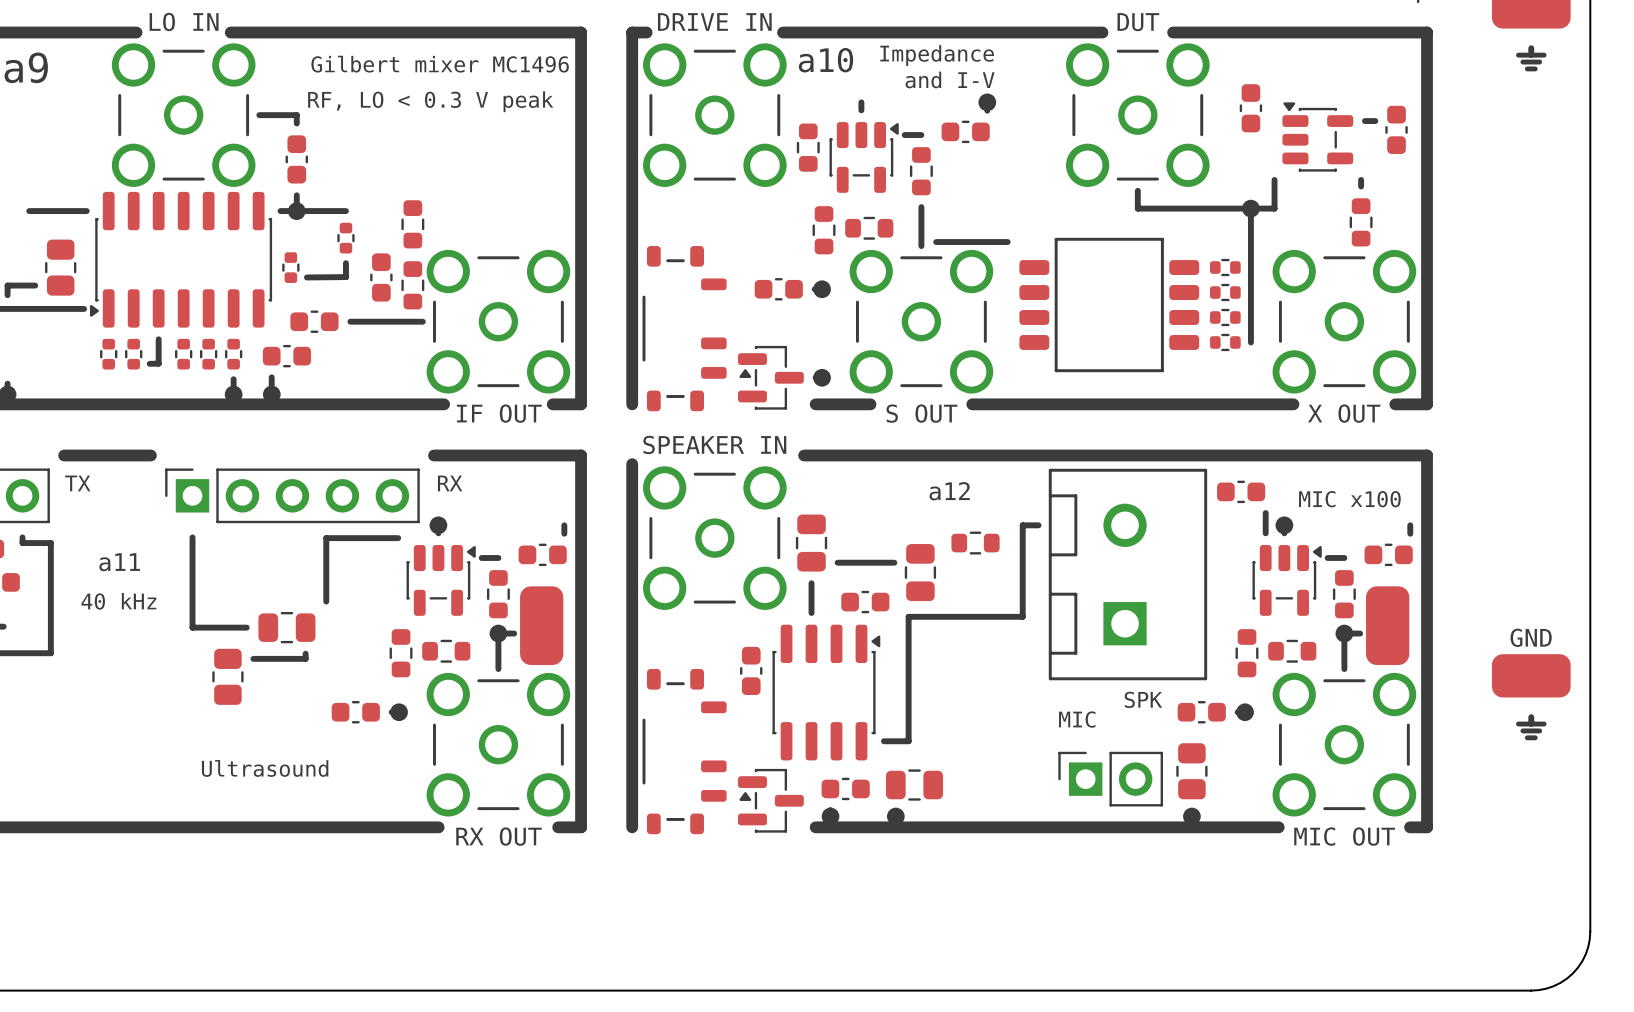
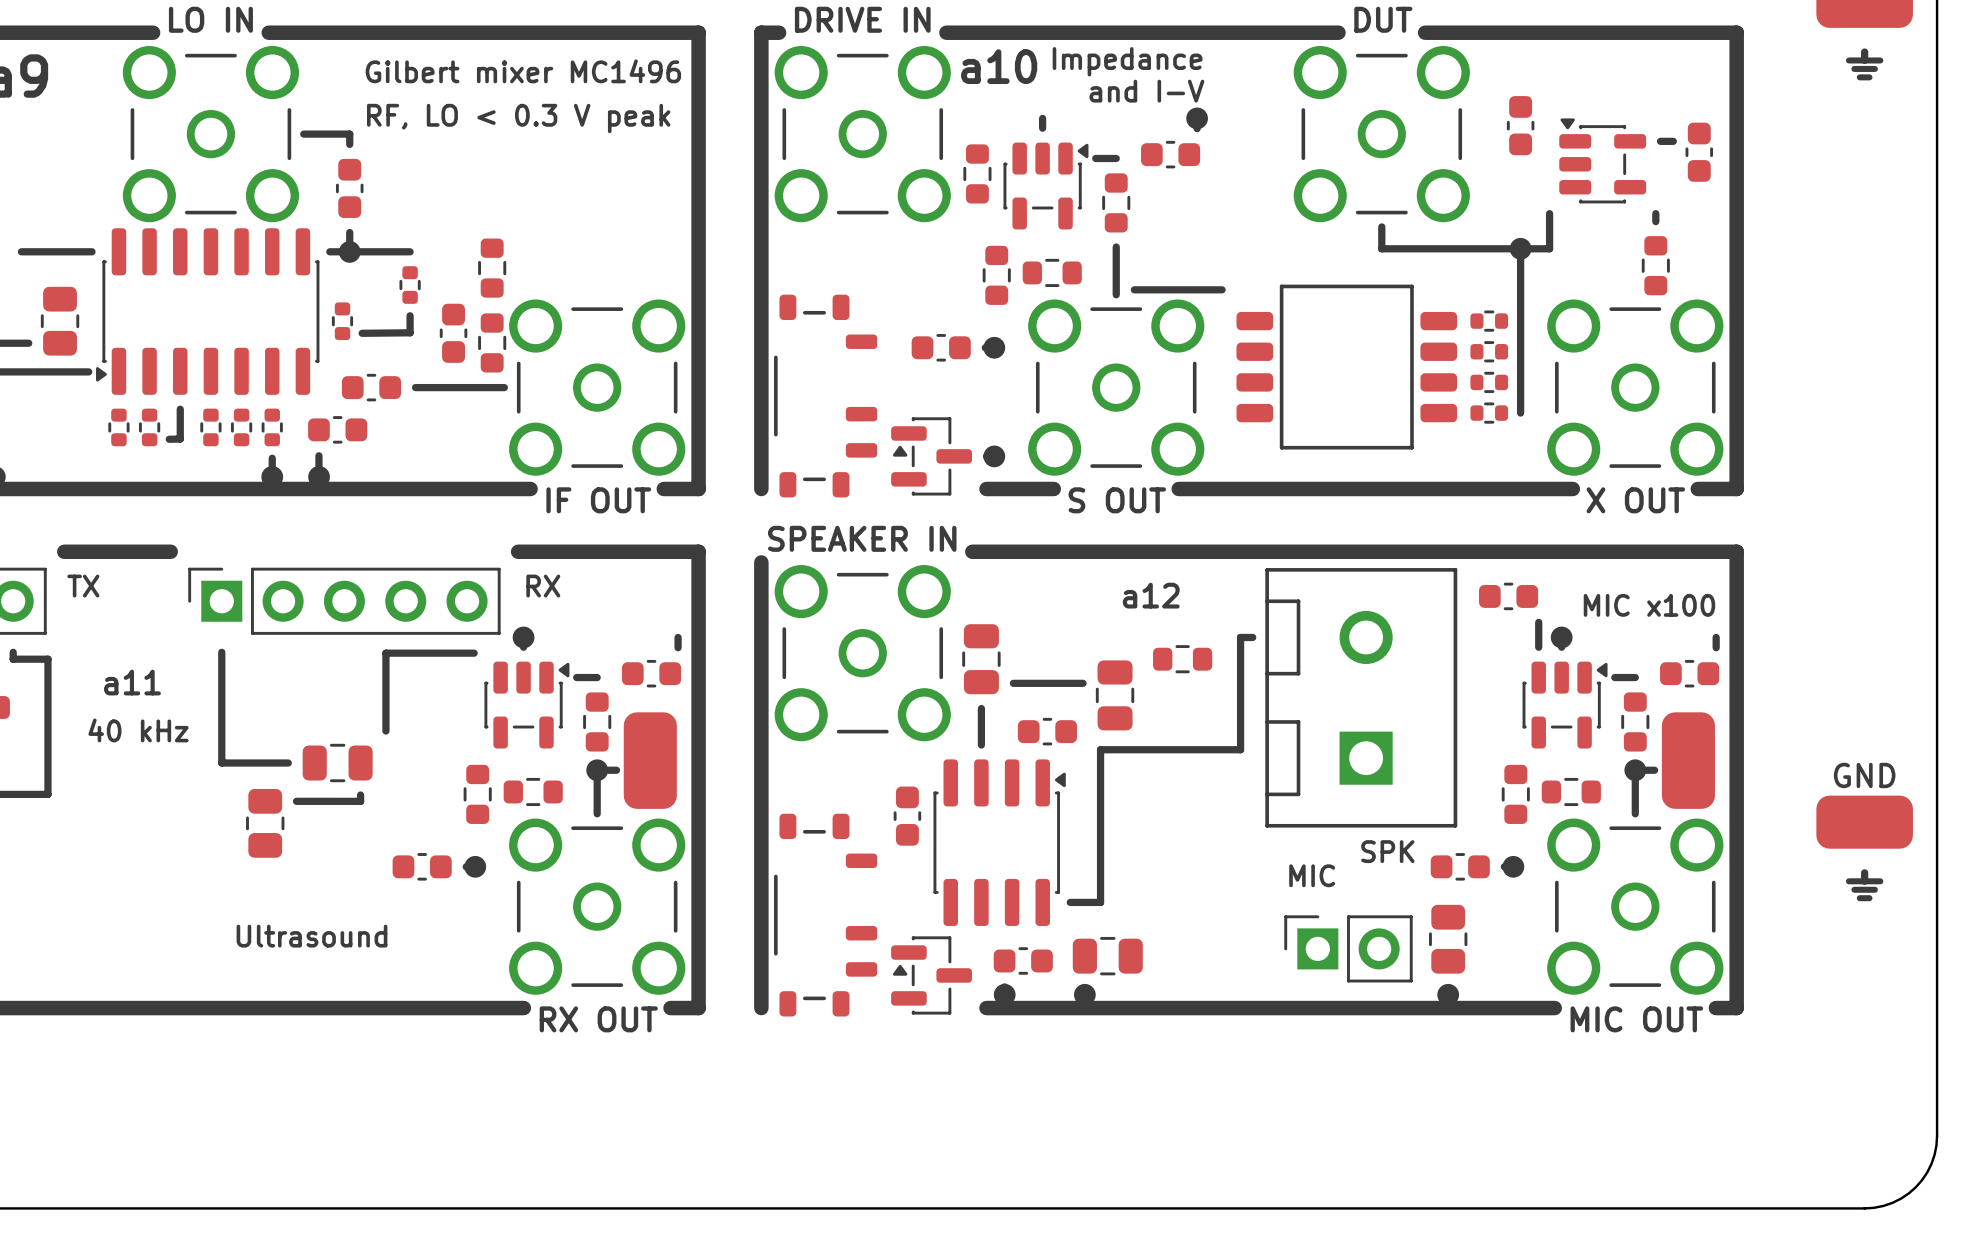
part footprint: [1048, 468, 1208, 681] -> [1265, 568, 1458, 828]
line: (1032, 525) (1038, 525) -> none

